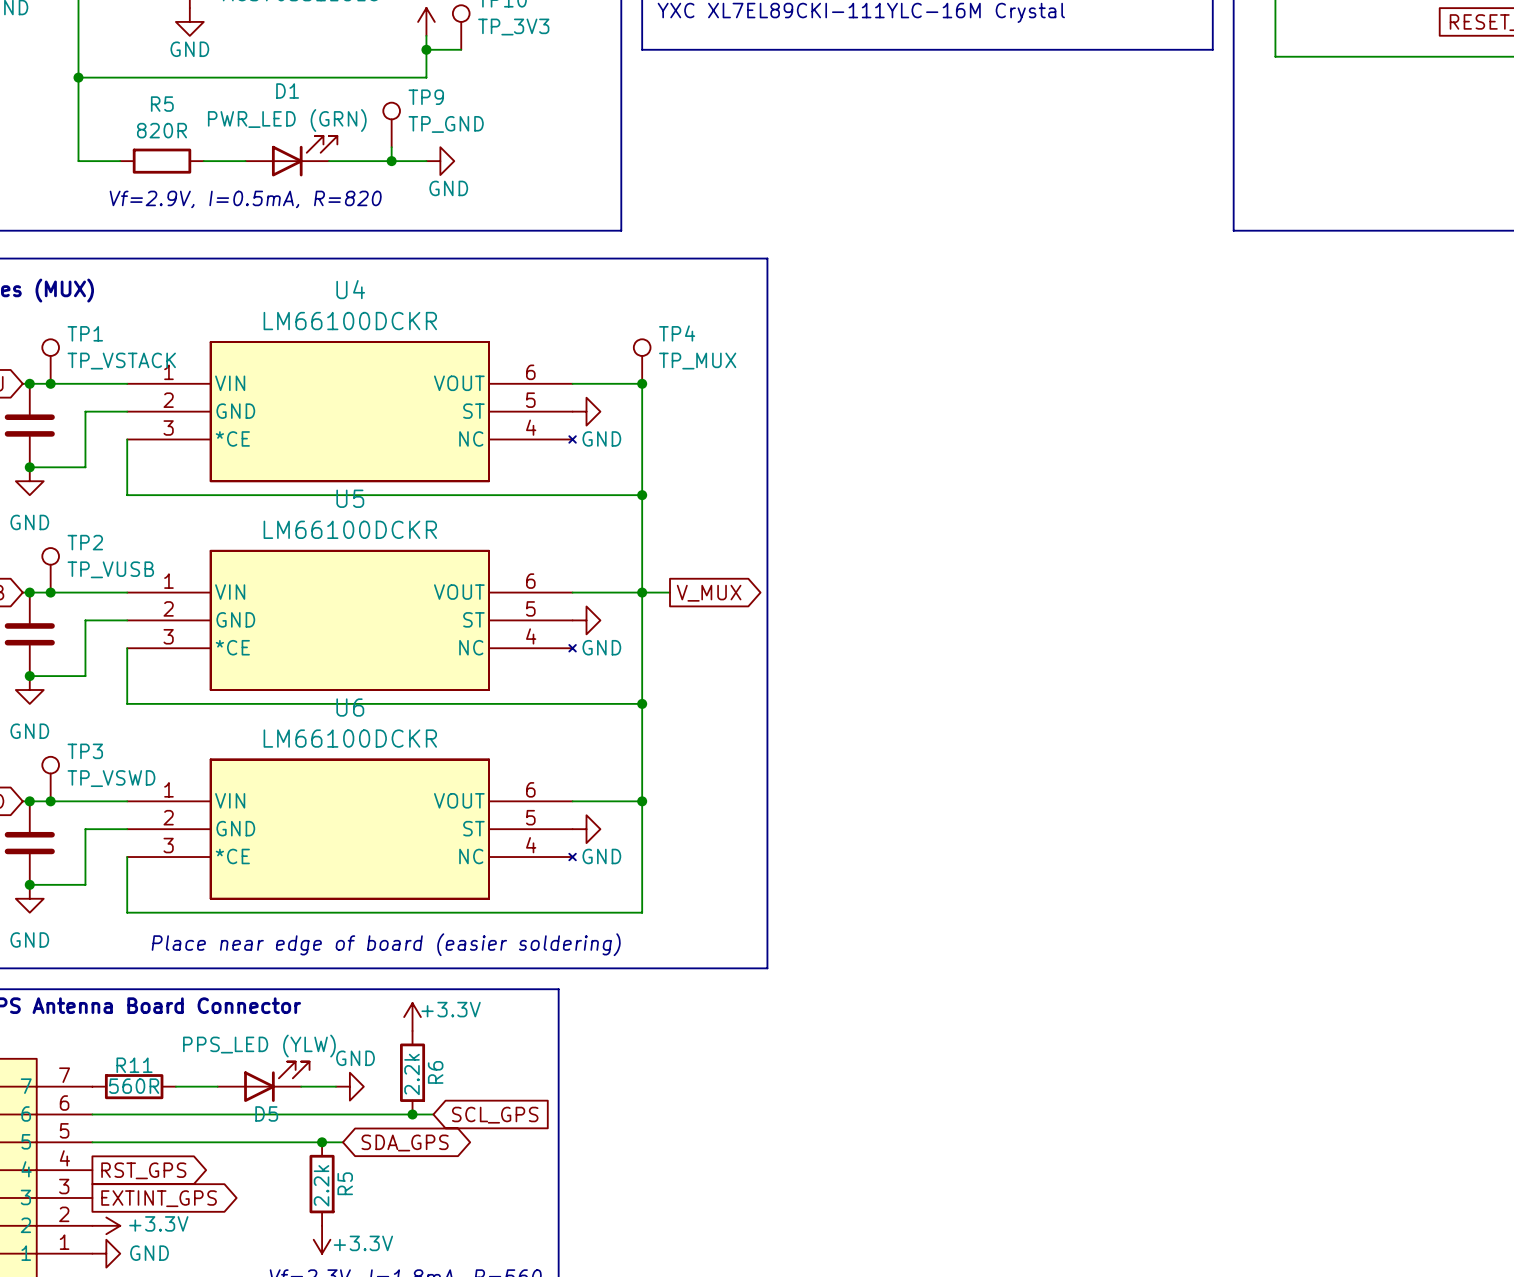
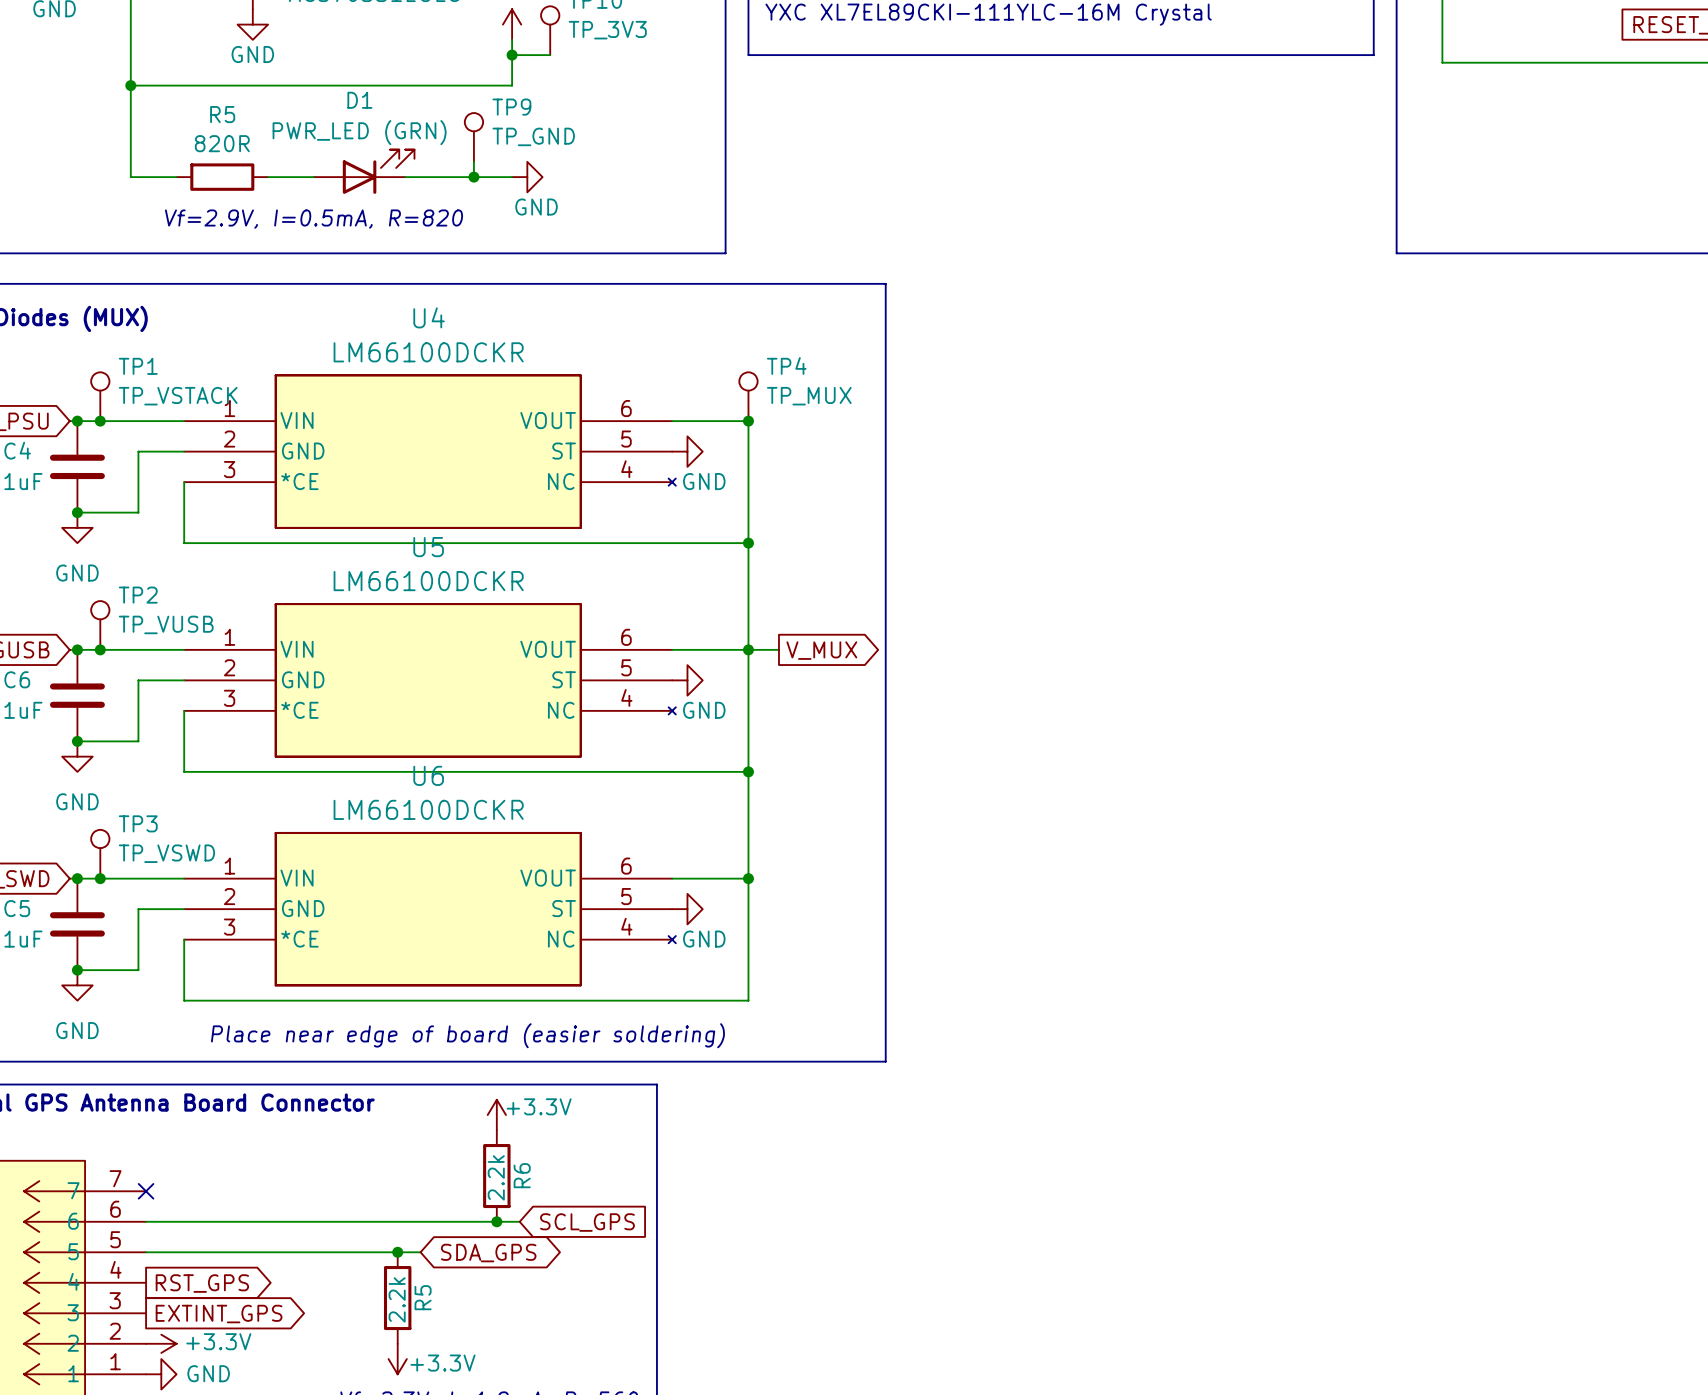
D5: PPS_LED (YLW) (263, 1081) -> none
no-connect mark: none -> (146, 1191)
R11: 560R (134, 1086) -> none
wire: (175, 1086) (217, 1086) -> none
wire: (301, 1086) (335, 1086) -> none
power symbol: GND (349, 1086) -> none

